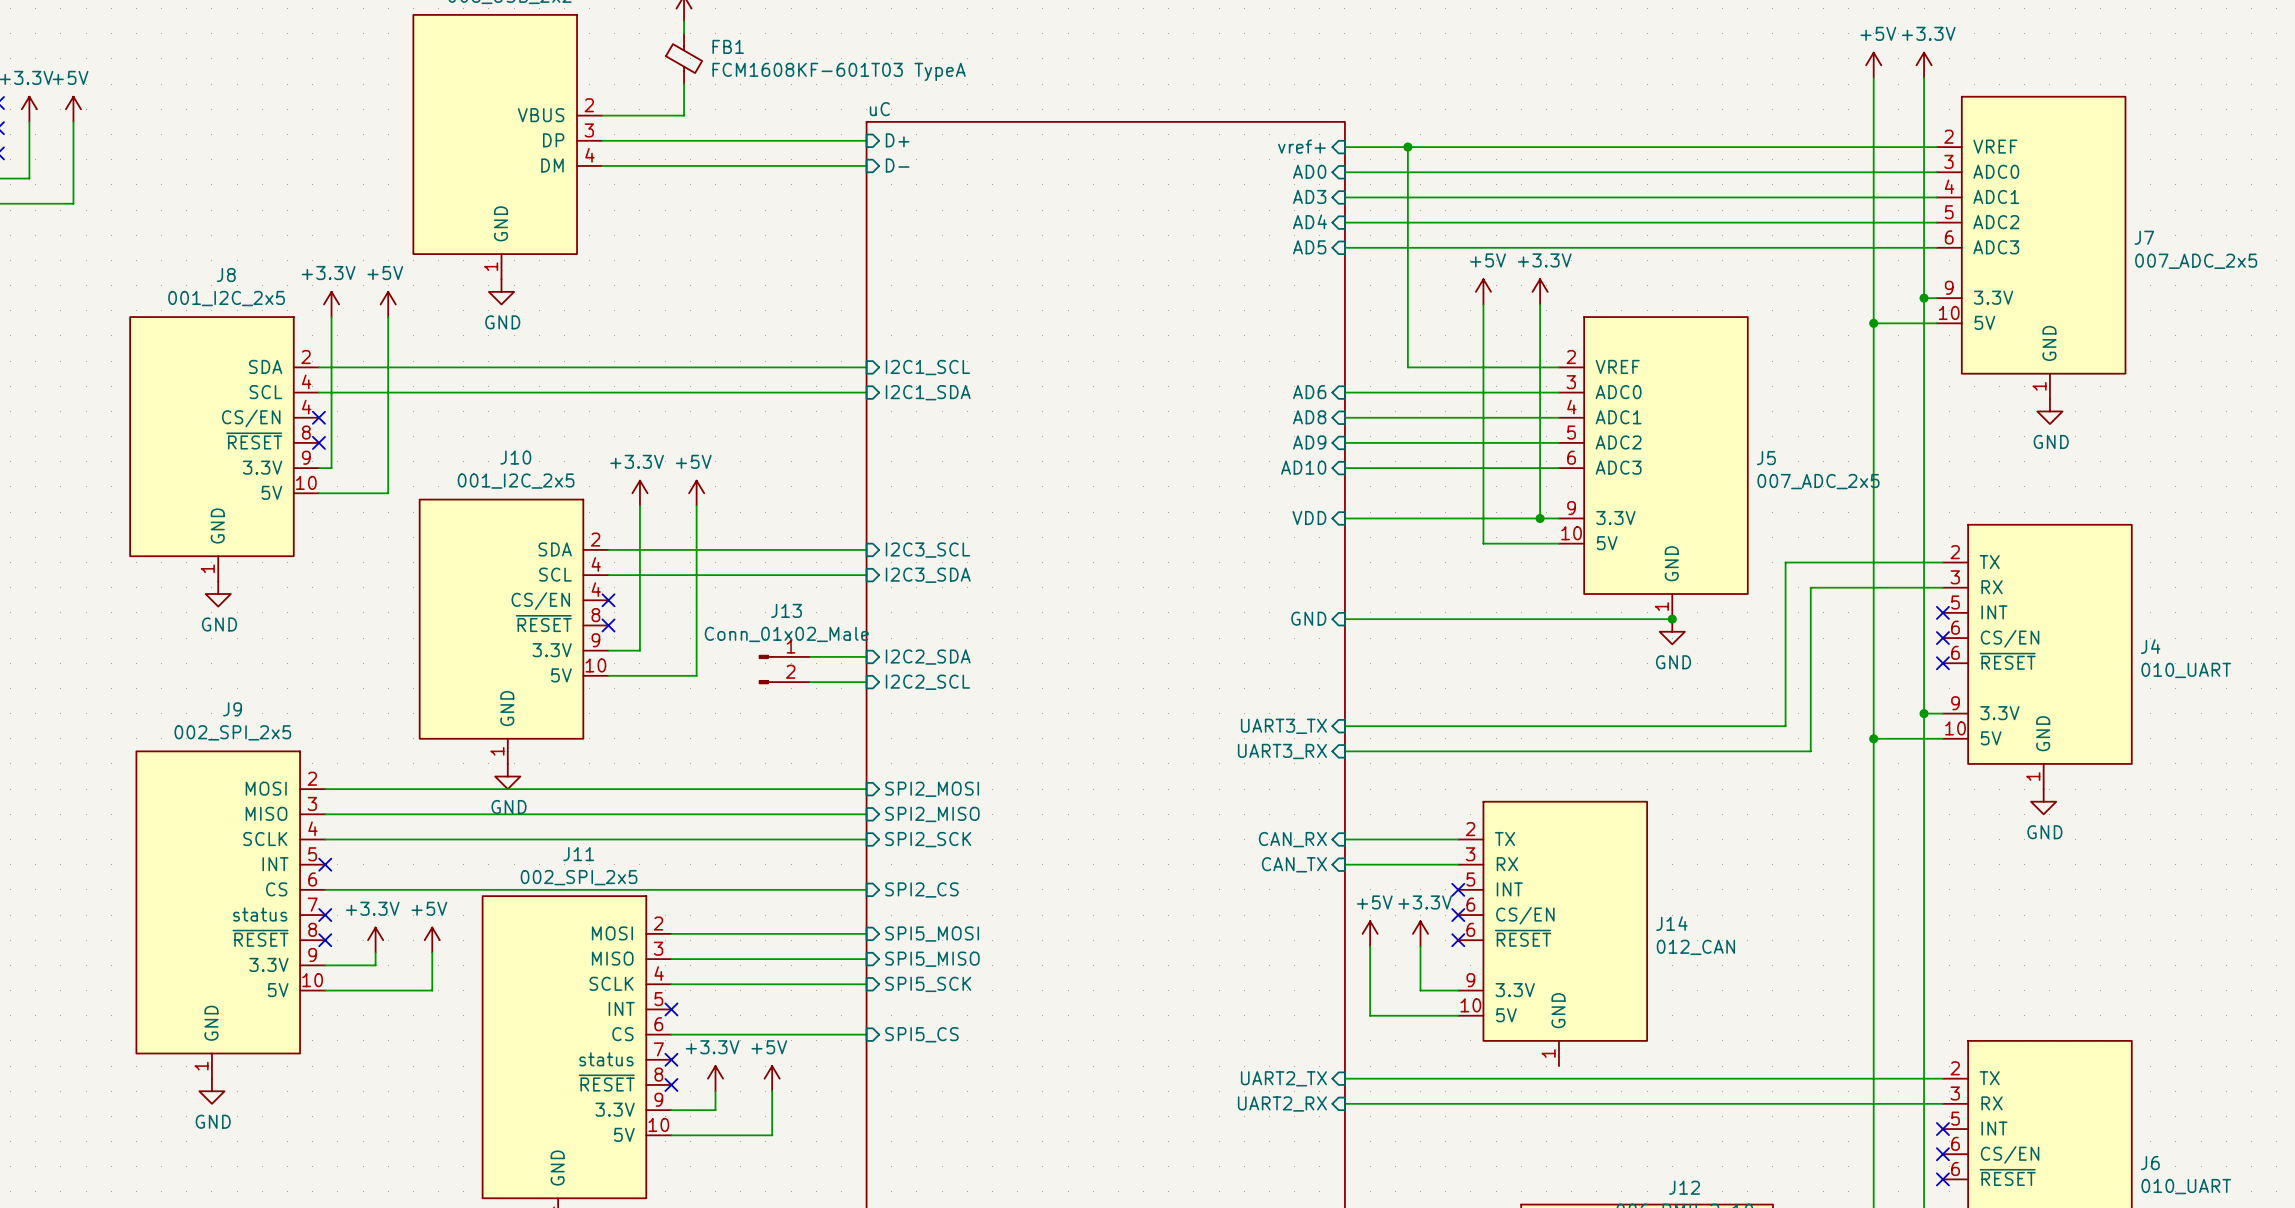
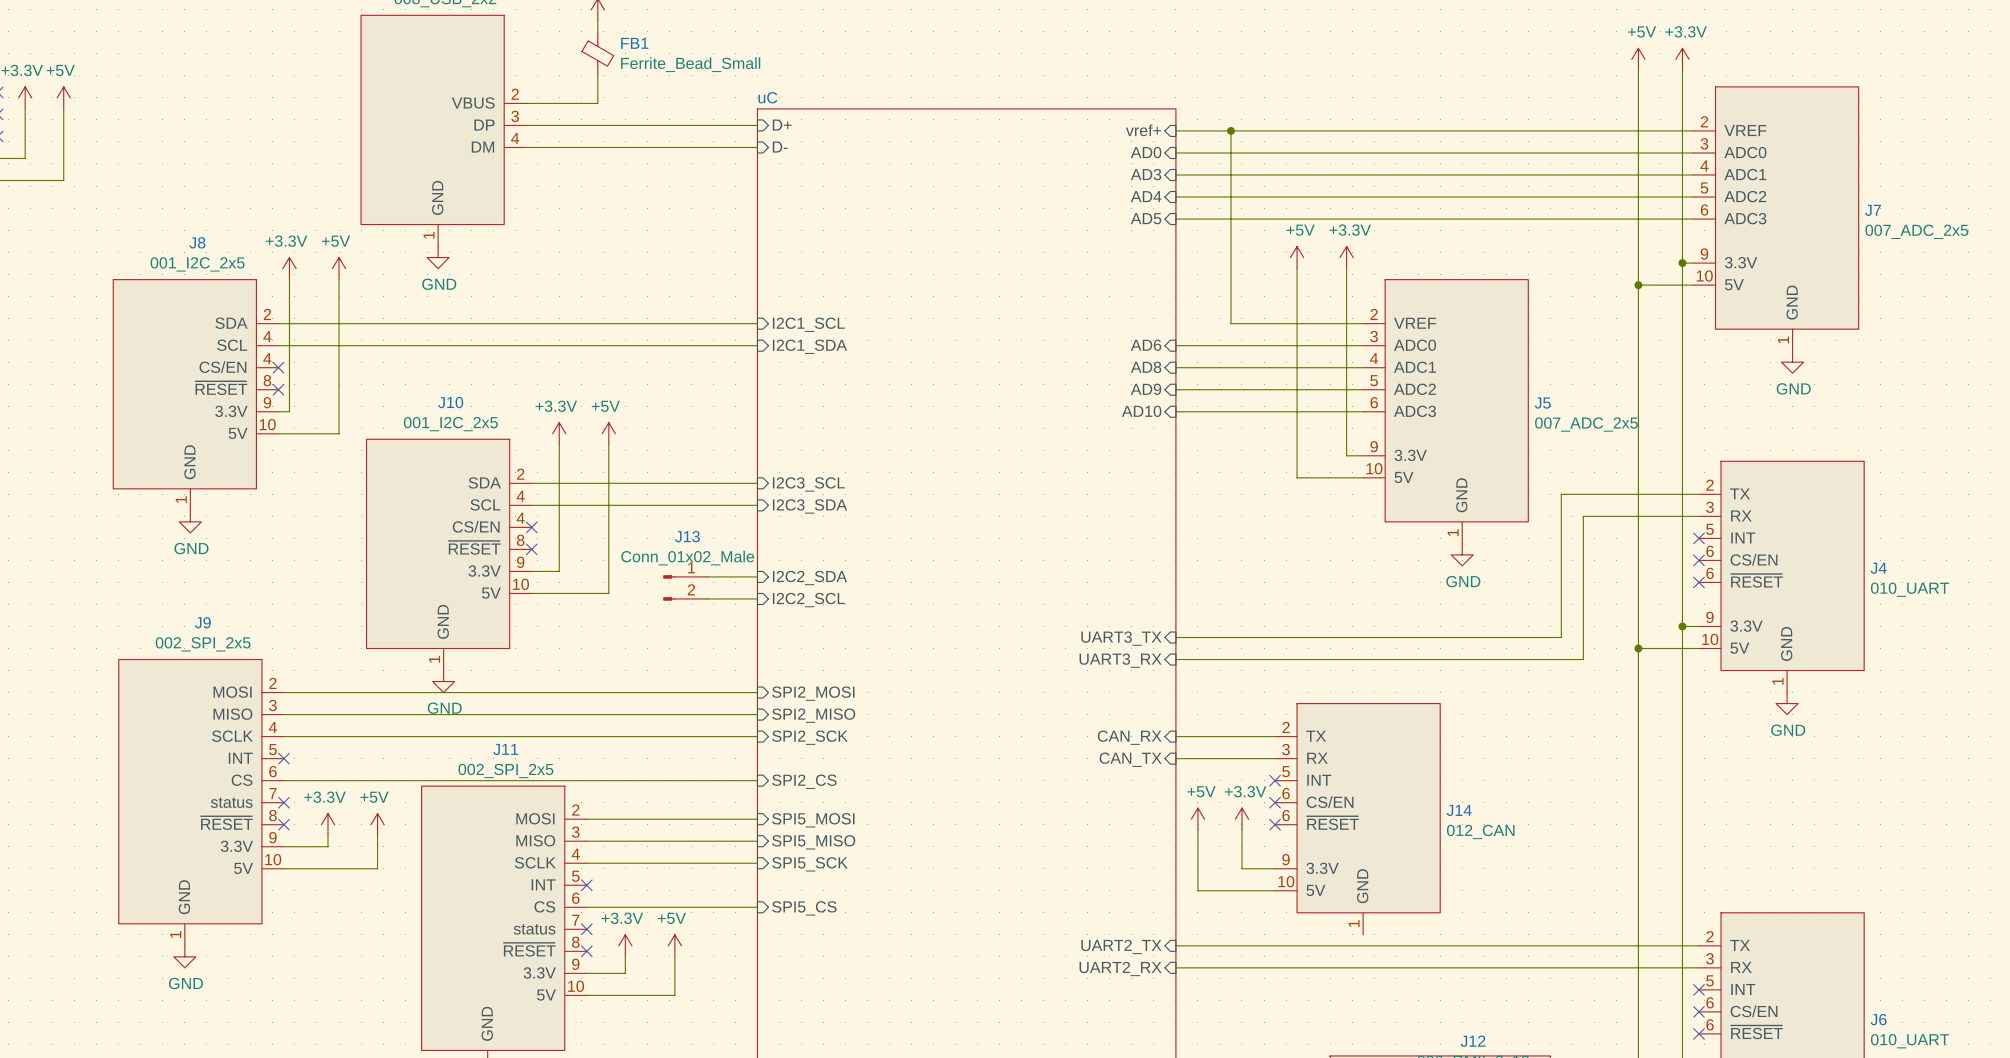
FB1 value: FCM1608KF-601T03 TypeA (839, 71) -> Ferrite_Bead_Small (690, 64)
sheet pin: VDD (1309, 518) -> none
wire: (1344, 518) (1540, 518) -> none
junction: (1540, 518) -> none
sheet pin: GND (1308, 618) -> none
wire: (1344, 619) (1672, 619) -> none
junction: (1672, 619) -> none

